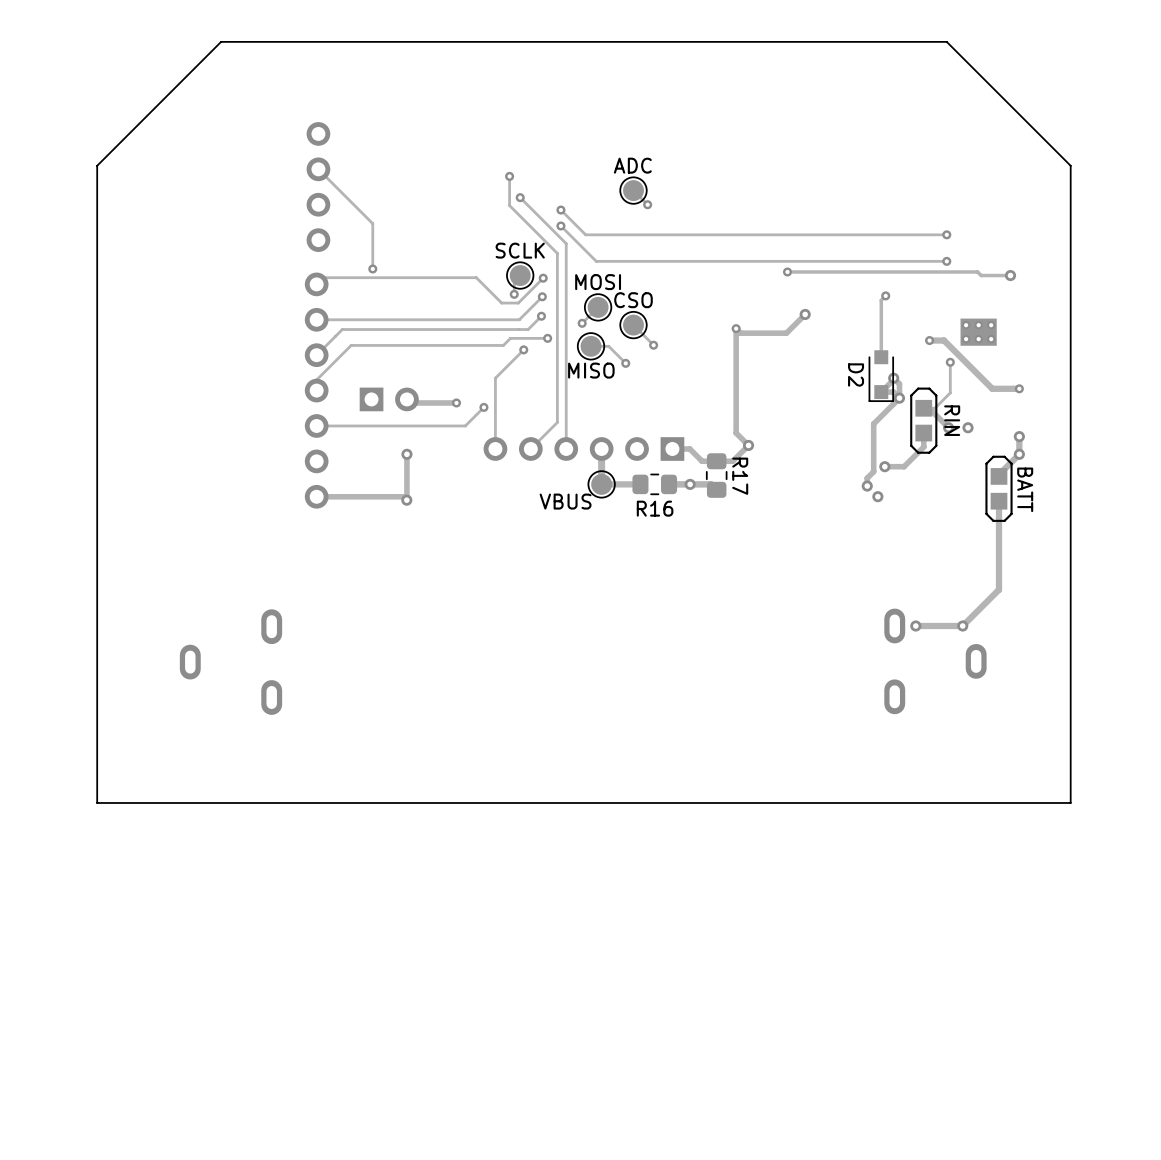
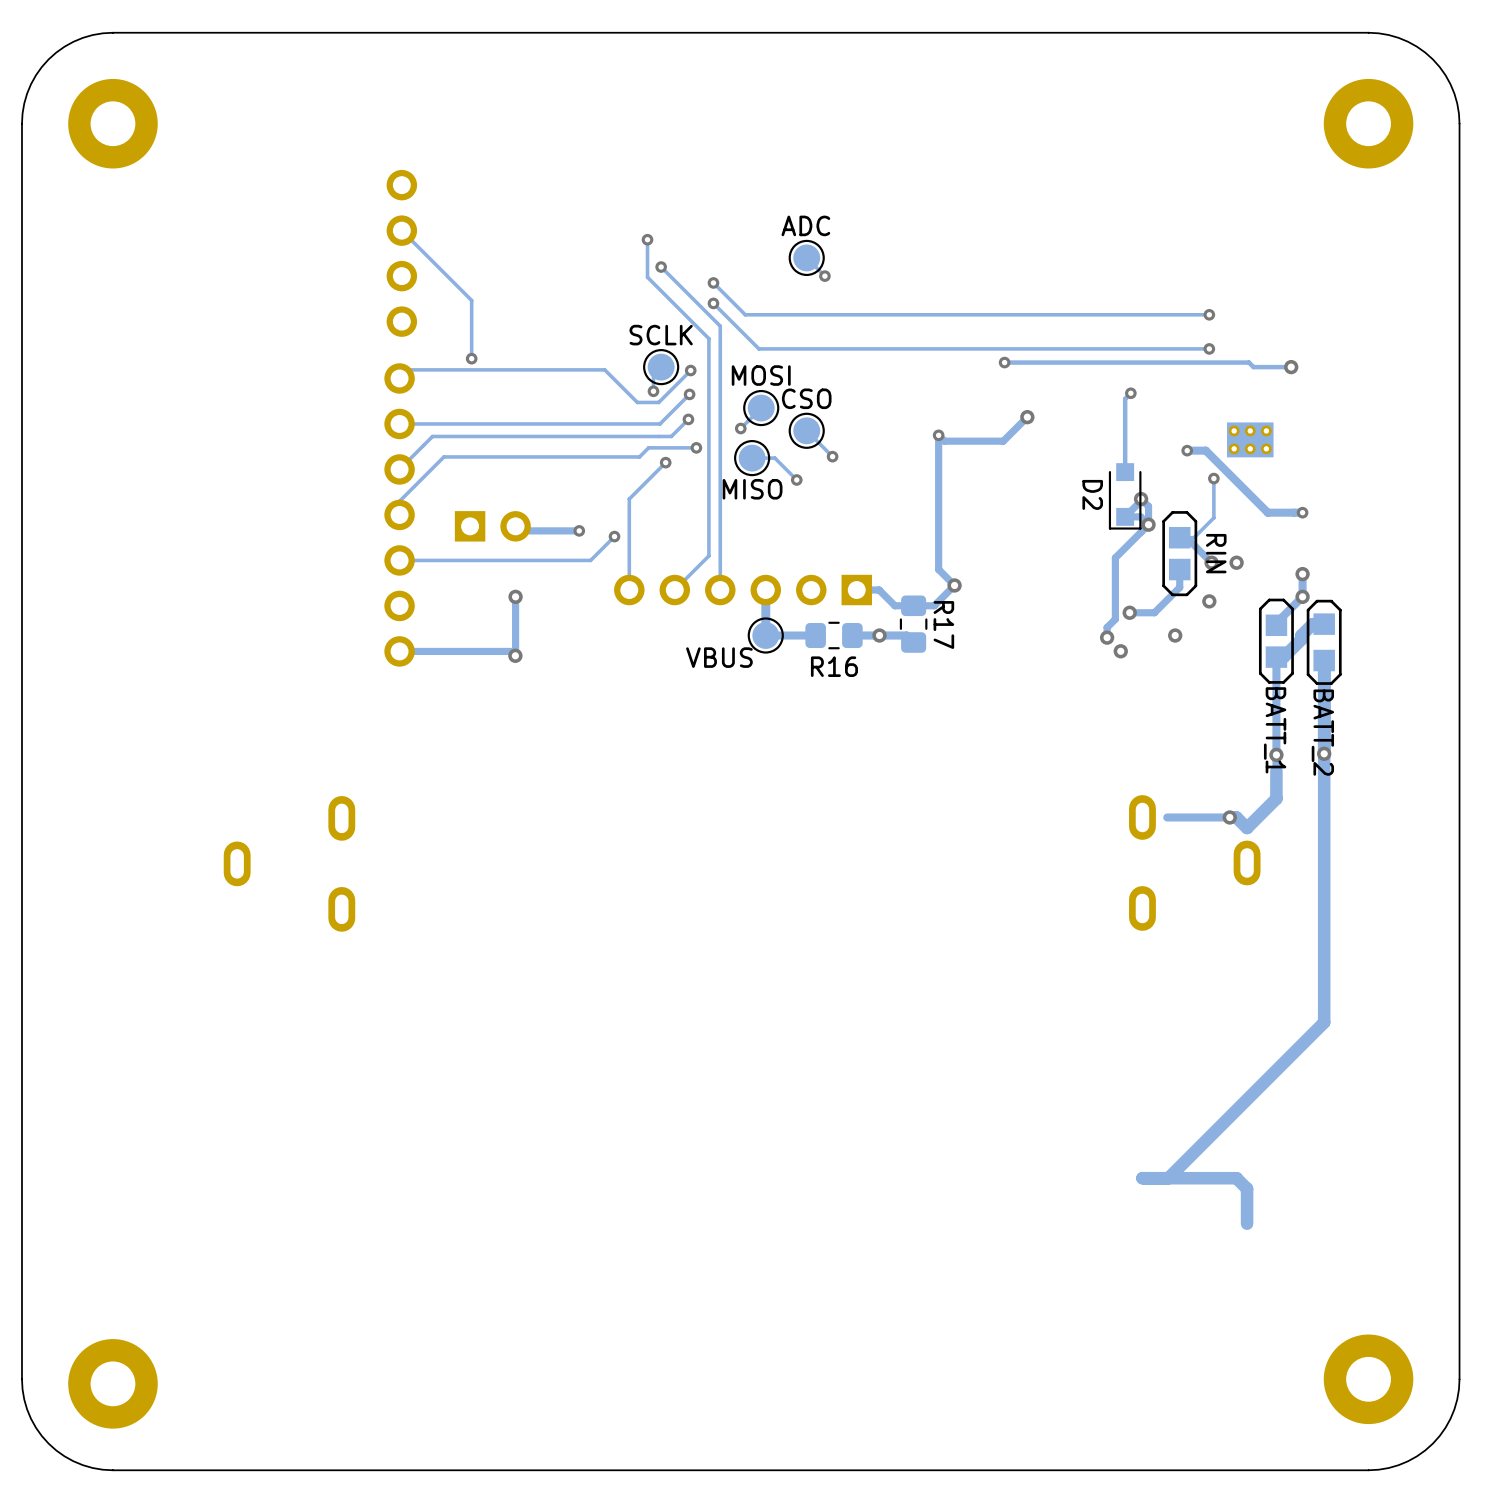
board edge: (946, 41) (1070, 165) (1070, 802) (97, 802) (97, 165) (221, 41) (946, 41) -> (1368, 32) (1388, 35) (1408, 41) (1432, 59) (1450, 84) (1457, 103) (1459, 123) (1459, 1379) (1457, 1399) (1450, 1418) (1432, 1443) (1408, 1461) (1388, 1468) (1368, 1470) (112, 1470) (92, 1468) (73, 1461) (48, 1443) (31, 1418) (24, 1399) (21, 1379) (21, 123) (24, 103) (31, 84) (48, 59) (73, 41) (92, 35) (112, 32) (1368, 32)
part: none -> (112, 123)
part: none -> (1368, 123)
via: none -> (1209, 601)
track: none -> (1324, 624) (1312, 624) (1301, 635) (1301, 639) (1283, 657) (1276, 657)
via: none -> (1175, 635)
part value: BATT (1025, 489) -> BATT_1 (1275, 730)
part: none -> BATT_2 (1324, 642)
track: none -> (1324, 660) (1324, 1022) (1168, 1178)
via: none -> (1324, 753)
via: none -> (1276, 754)
track: (999, 589) (962, 625) -> (1276, 770) (1276, 798) (1247, 828) (1236, 817) (1229, 817)
via: (915, 625) -> none
track: none -> (1142, 1178) (1236, 1178) (1247, 1188) (1247, 1223)
part: none -> (1368, 1379)
part: none -> (112, 1383)

